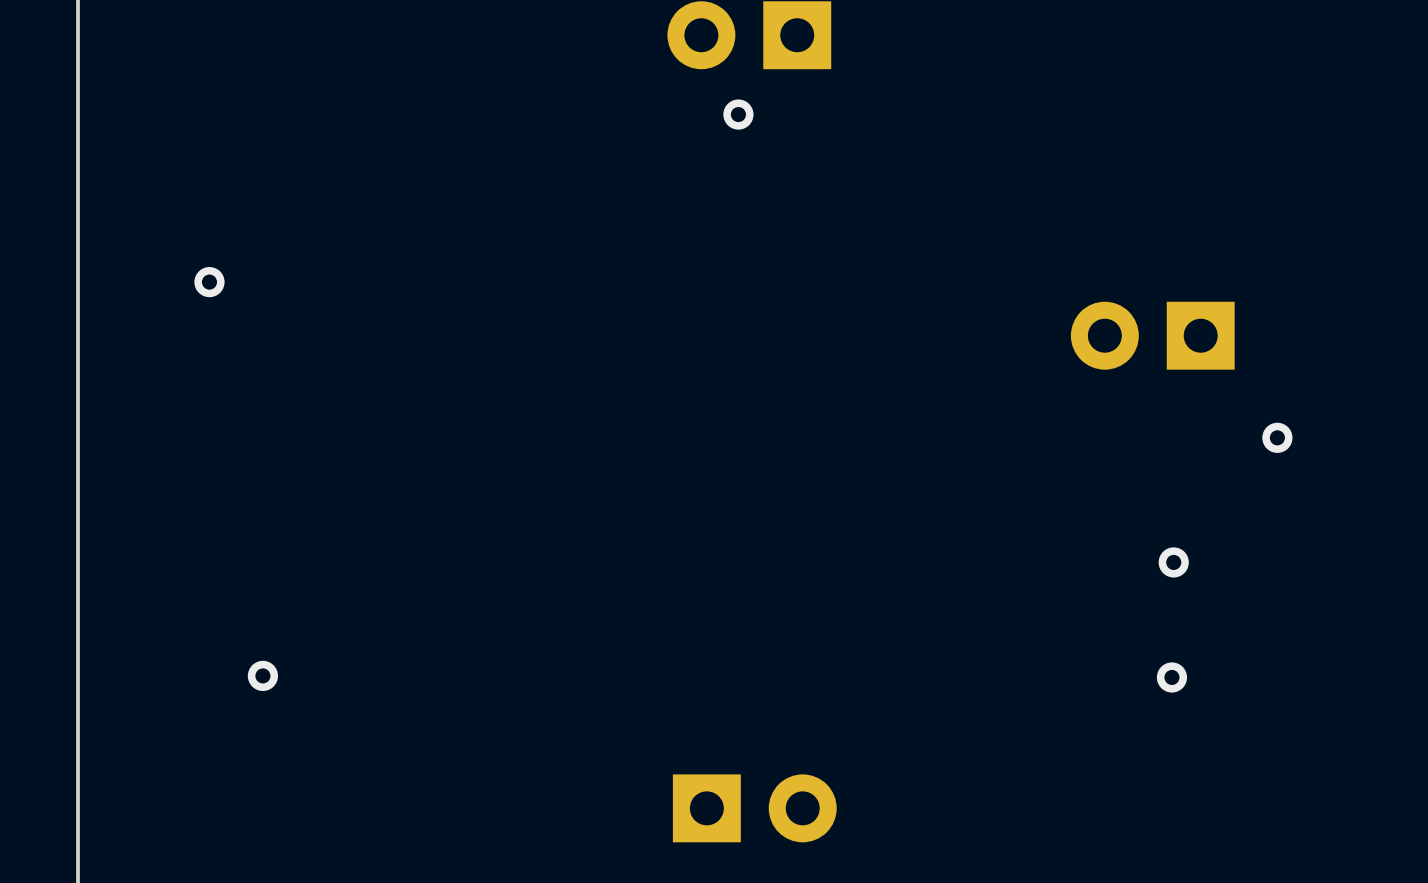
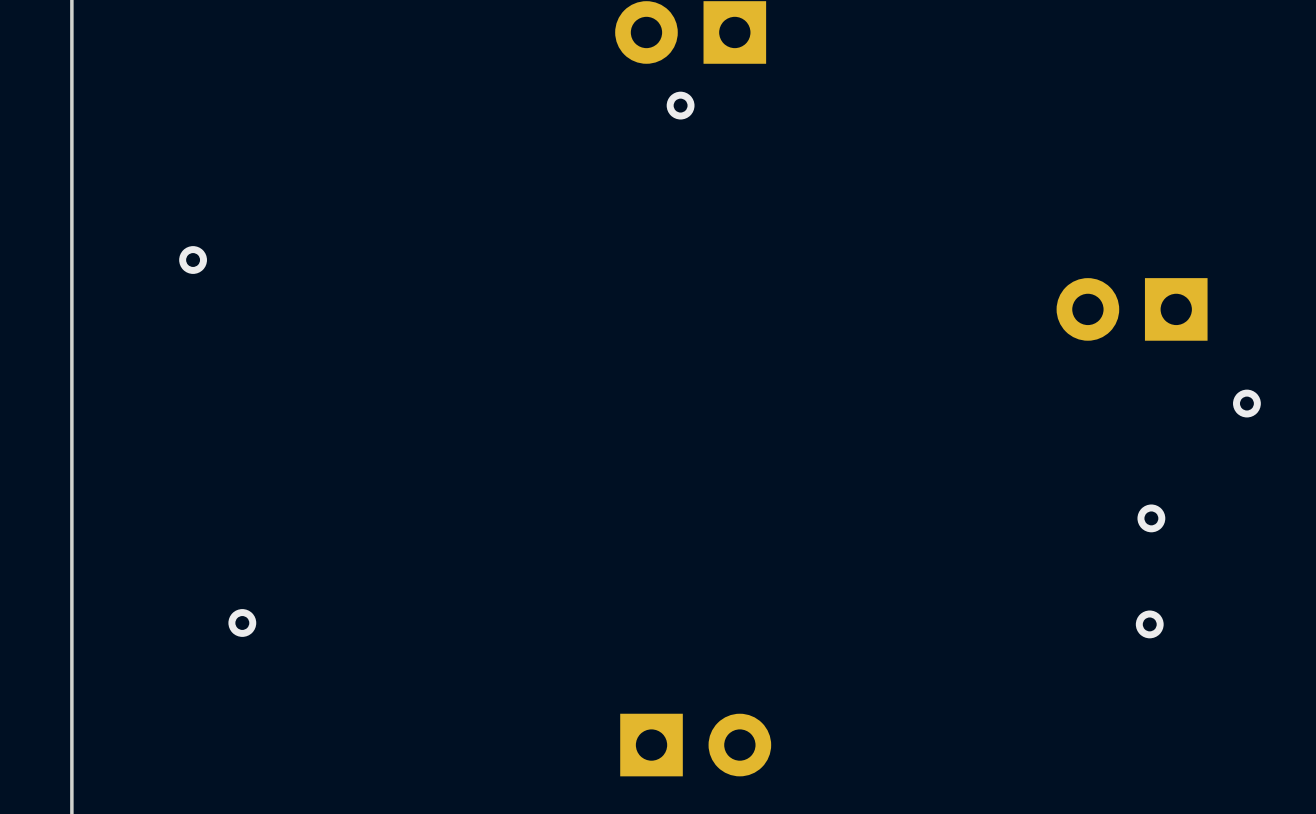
part position: (1152, 335) -> (1132, 309)
via: (1277, 437) -> none
via: none -> (1246, 403)
via: (1173, 562) -> none
via: none -> (1151, 518)
via: (1171, 677) -> none
via: none -> (1149, 624)

